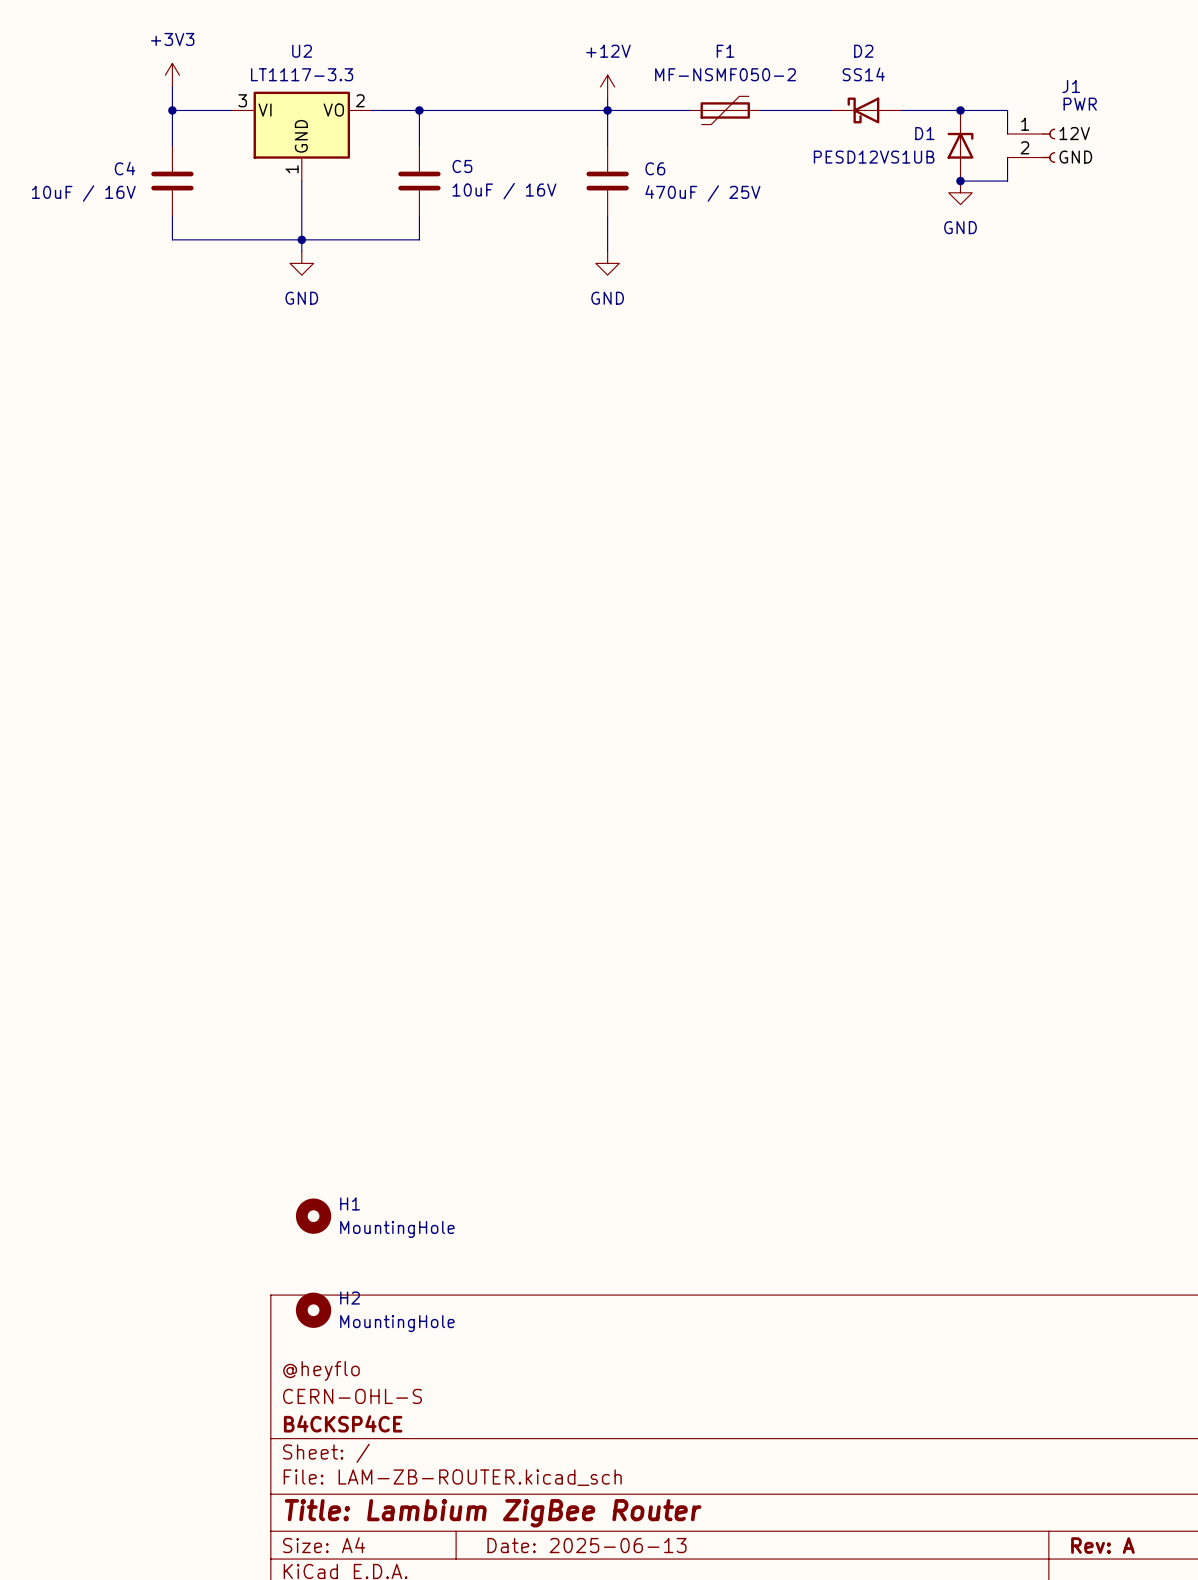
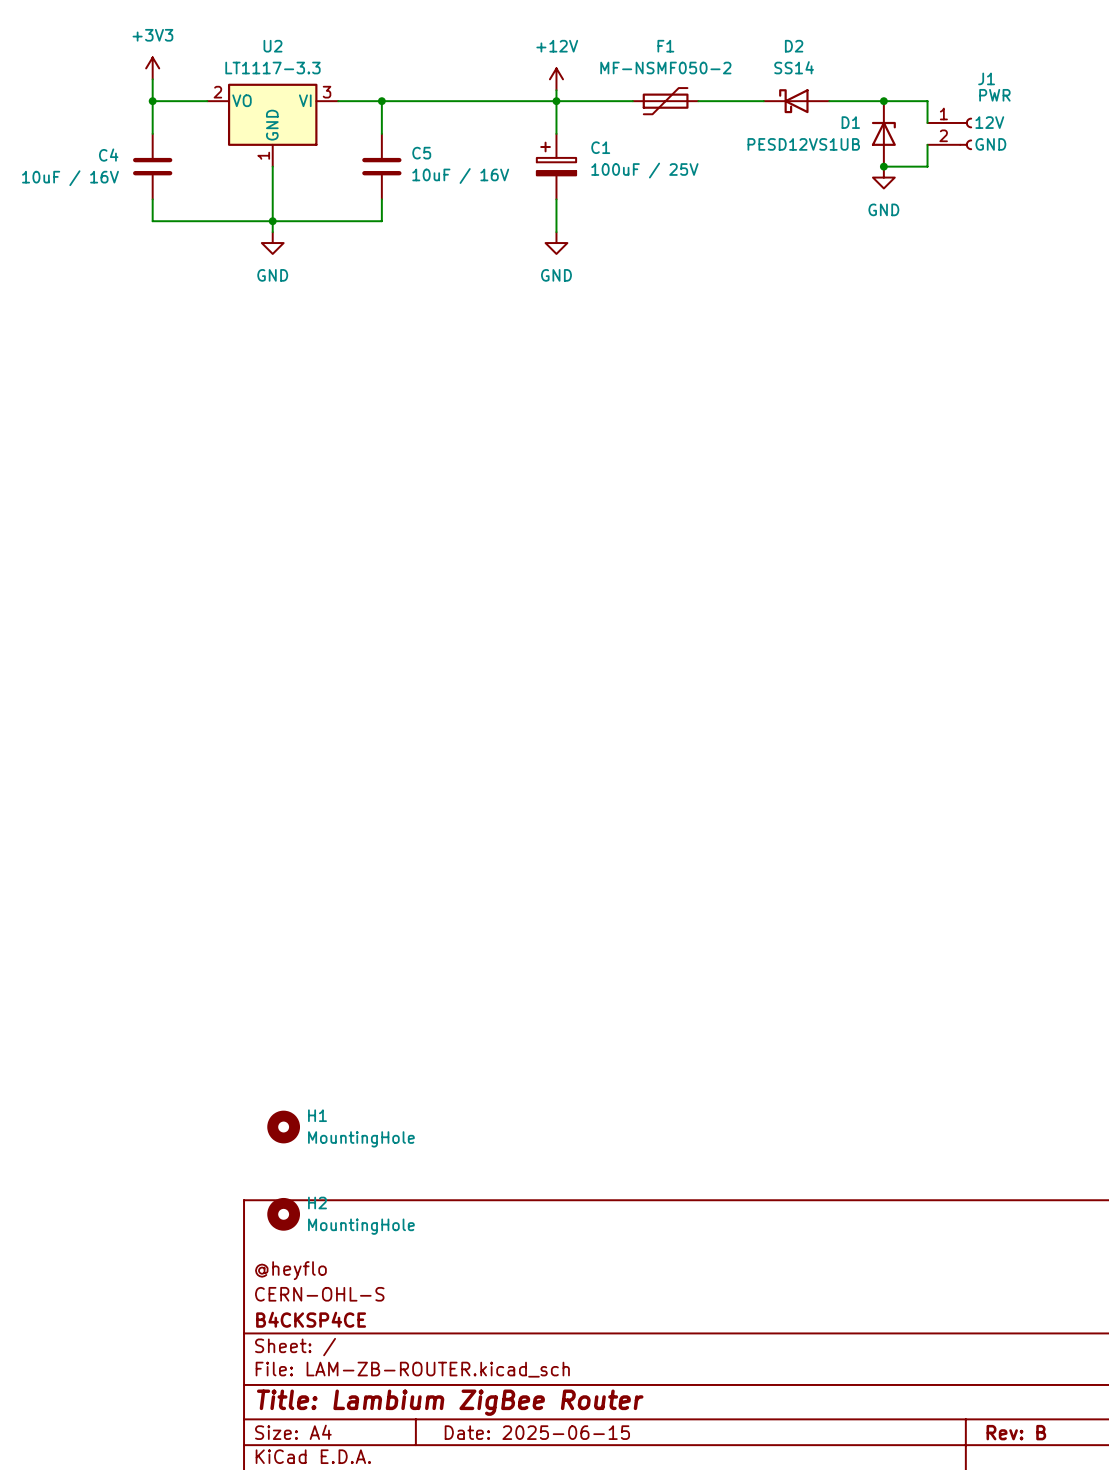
U2 flip: as is (301, 125) -> left-right (272, 114)
C6: 470uF / 25V (607, 181) -> none
C1: none -> 100uF / 25V (556, 166)
title block: Date: 2025-06-13 (587, 1545) -> Date: 2025-06-15 (537, 1432)
title block: Rev: A (1102, 1545) -> Rev: B (1016, 1432)

